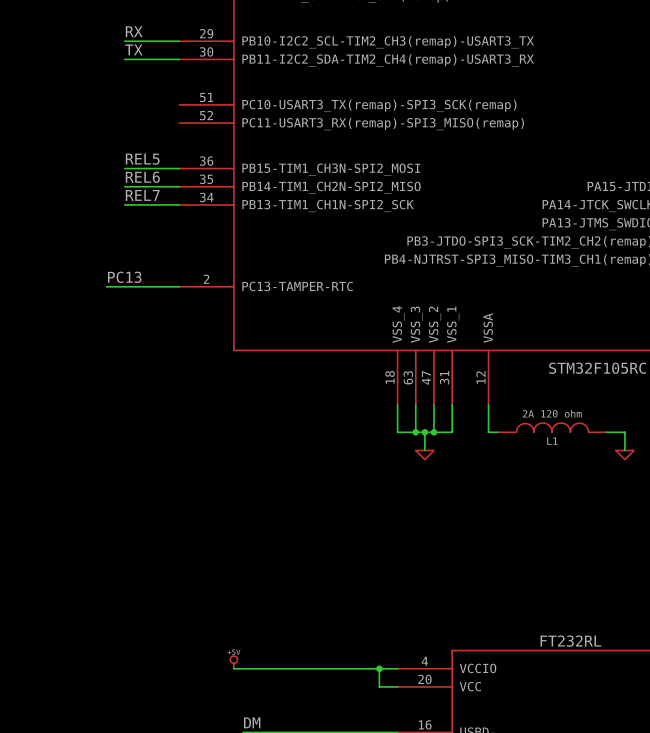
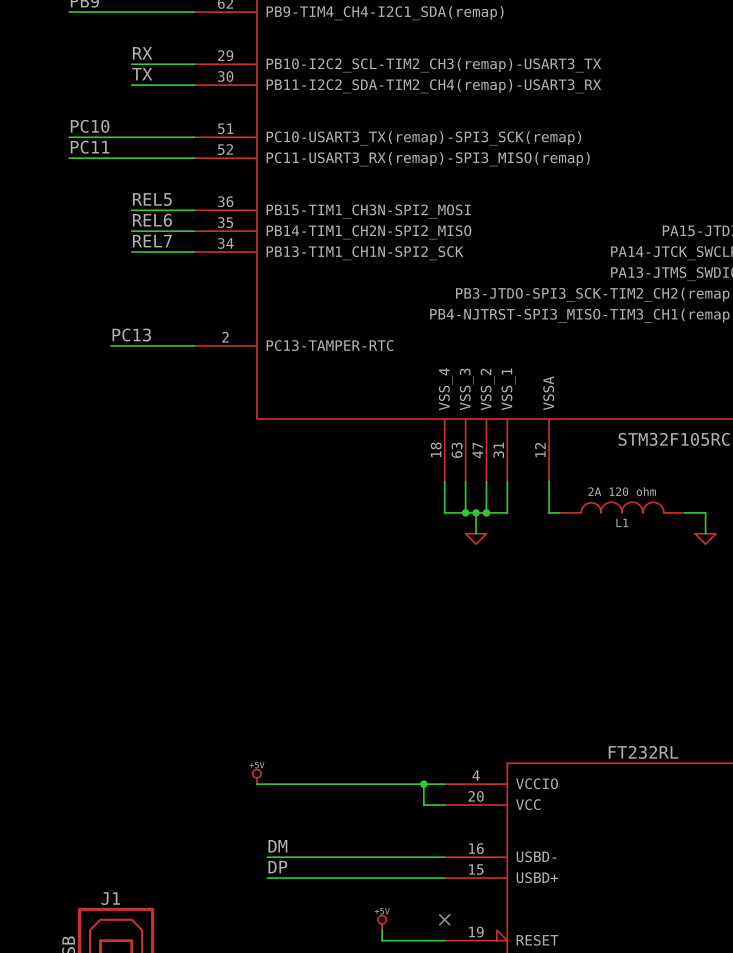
label: none -> PC10 (90, 126)
wire: none -> (69, 137) (194, 137)
label: none -> PC11 (90, 147)
wire: none -> (69, 158) (194, 158)

